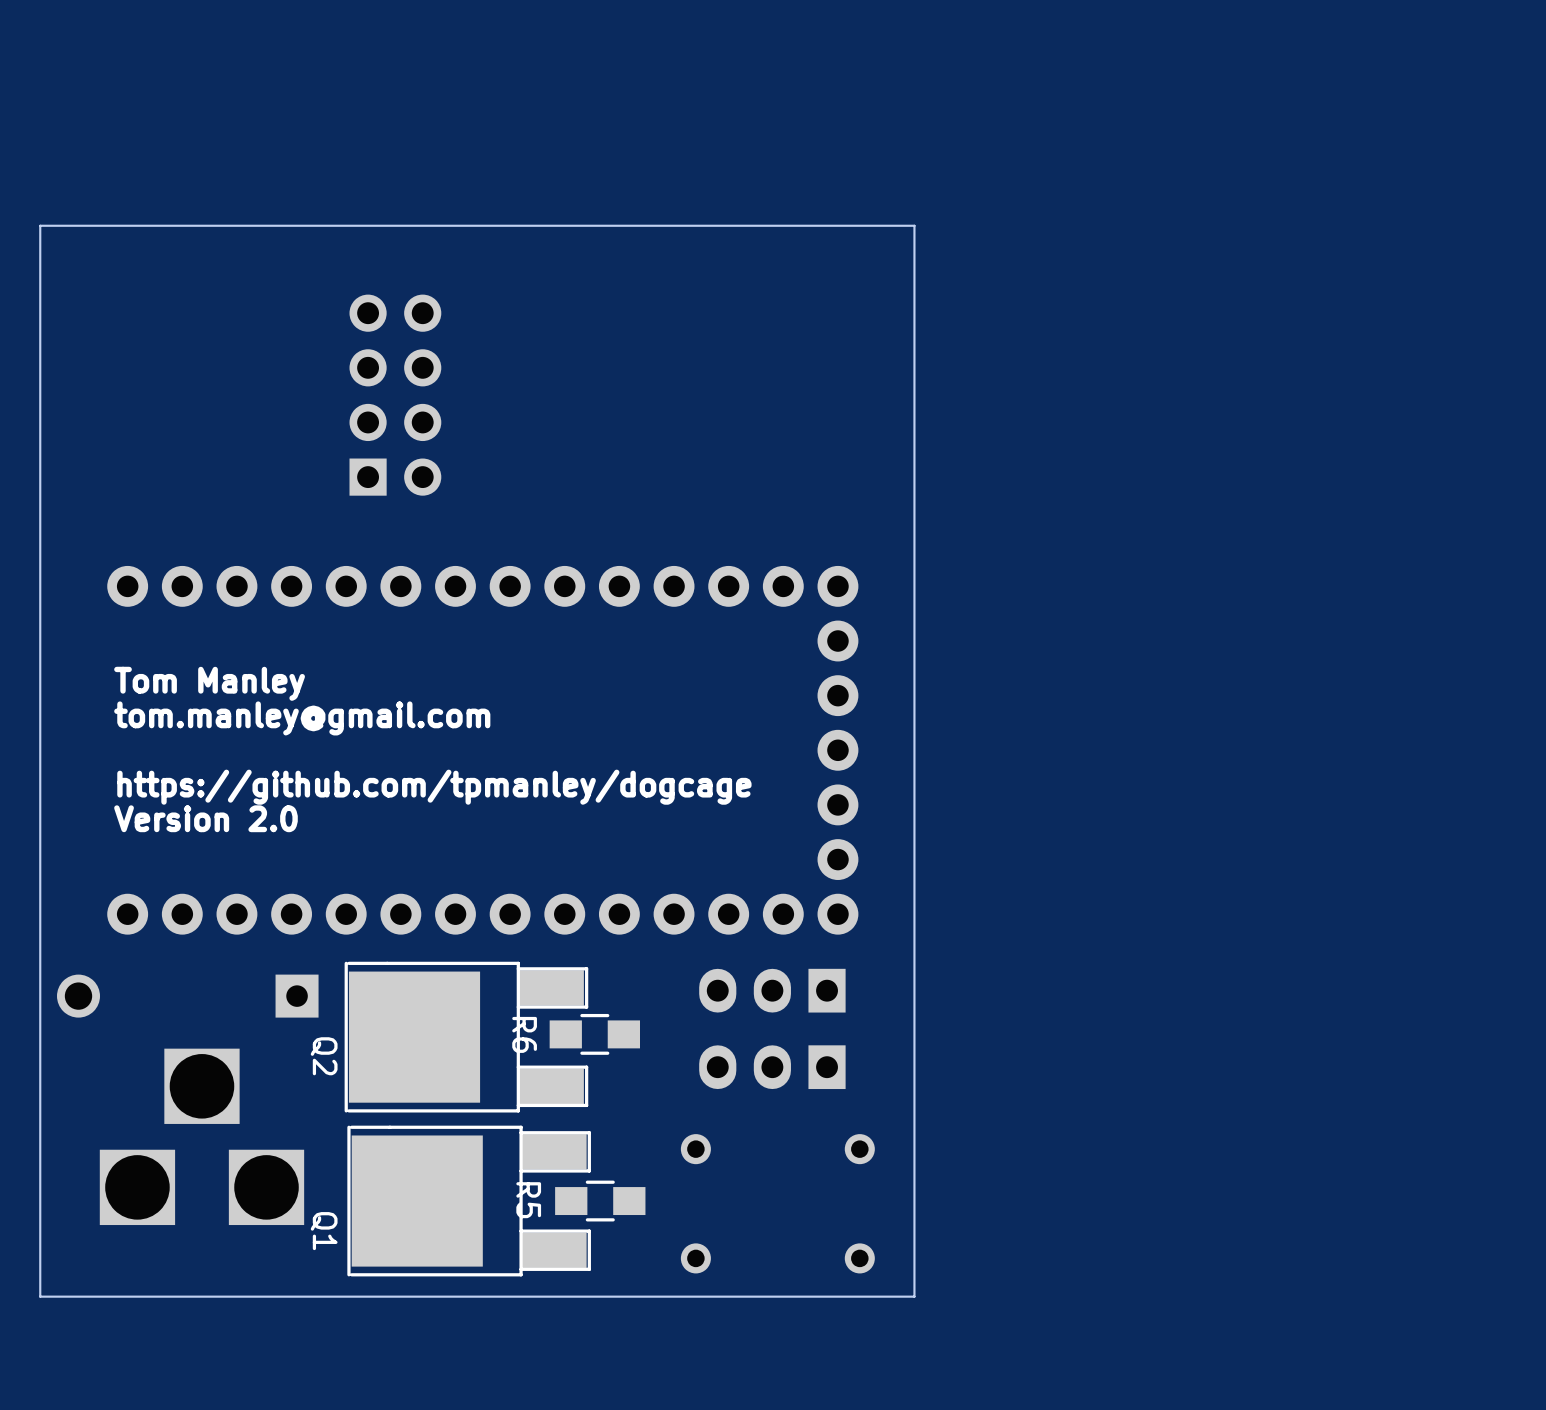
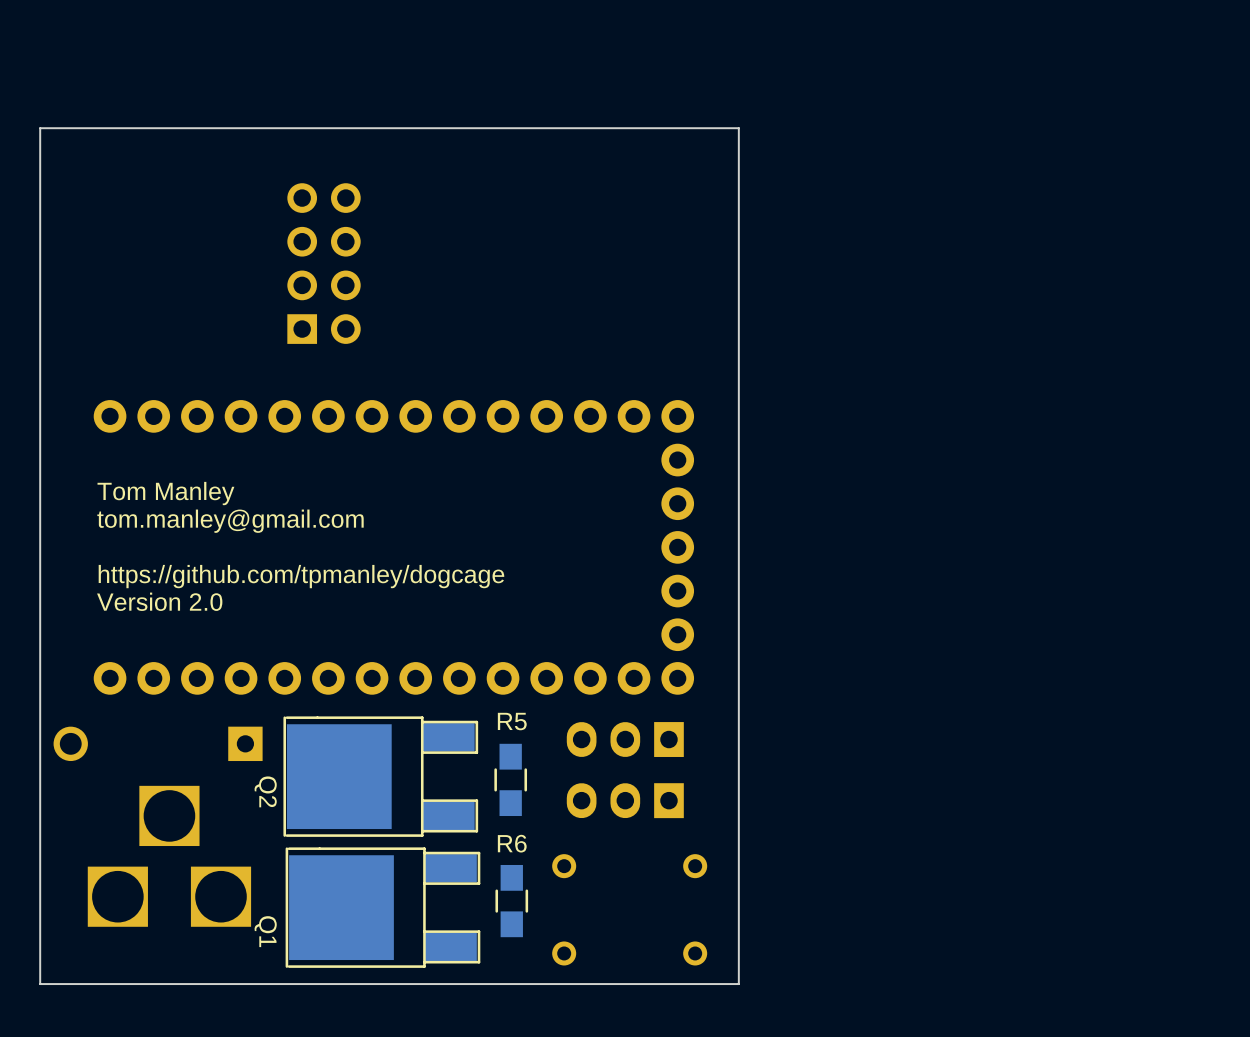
R6 rotation: 0° (594, 1034) -> 90° clockwise (511, 901)
R6 position: (594, 1034) -> (511, 901)
R5 rotation: 0° (600, 1201) -> 90° clockwise (510, 779)
R5 position: (600, 1201) -> (510, 779)

